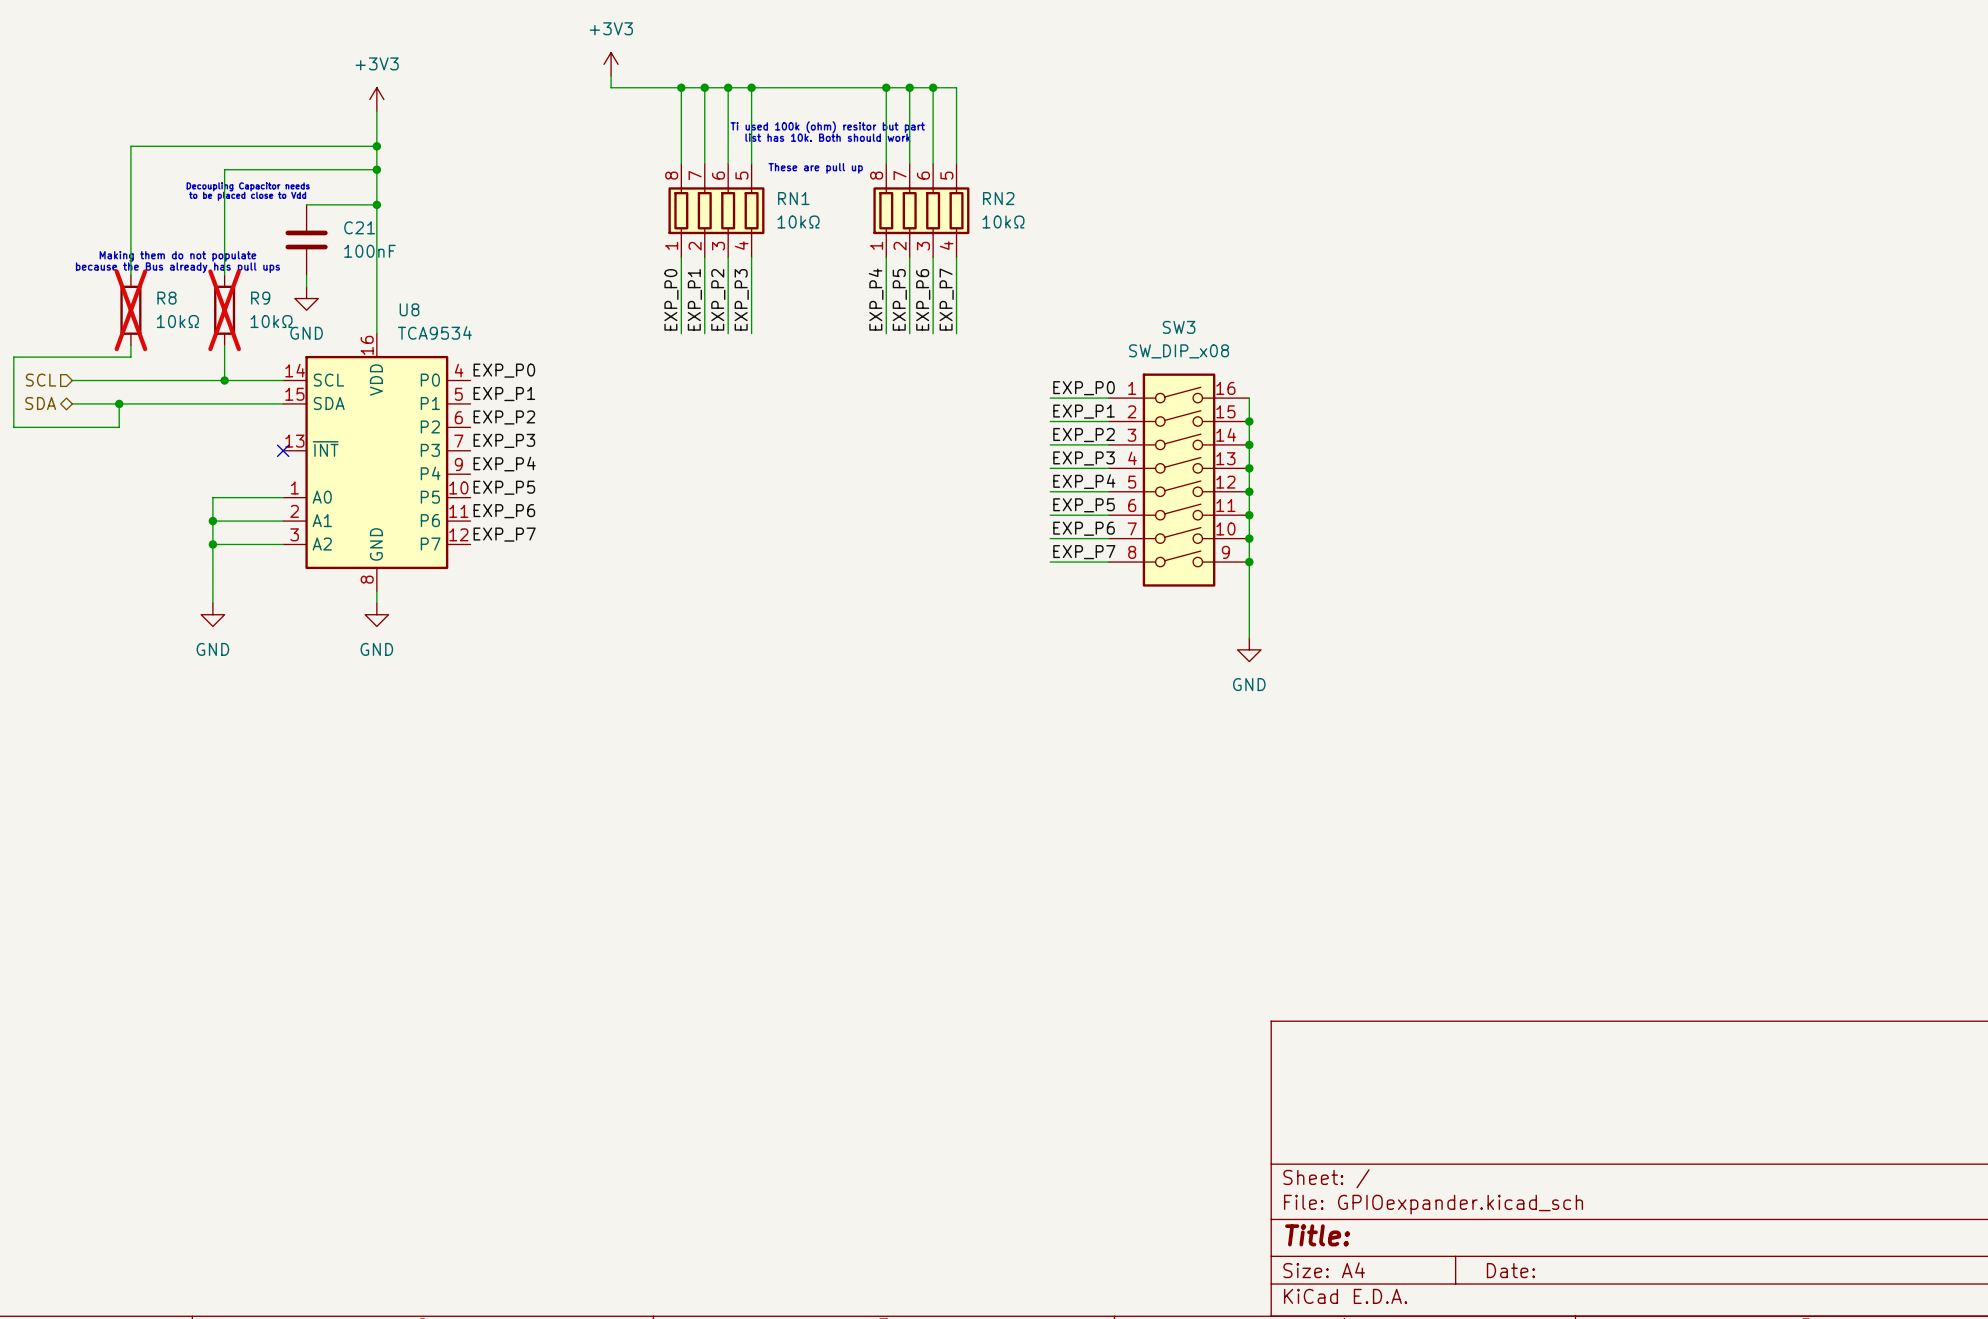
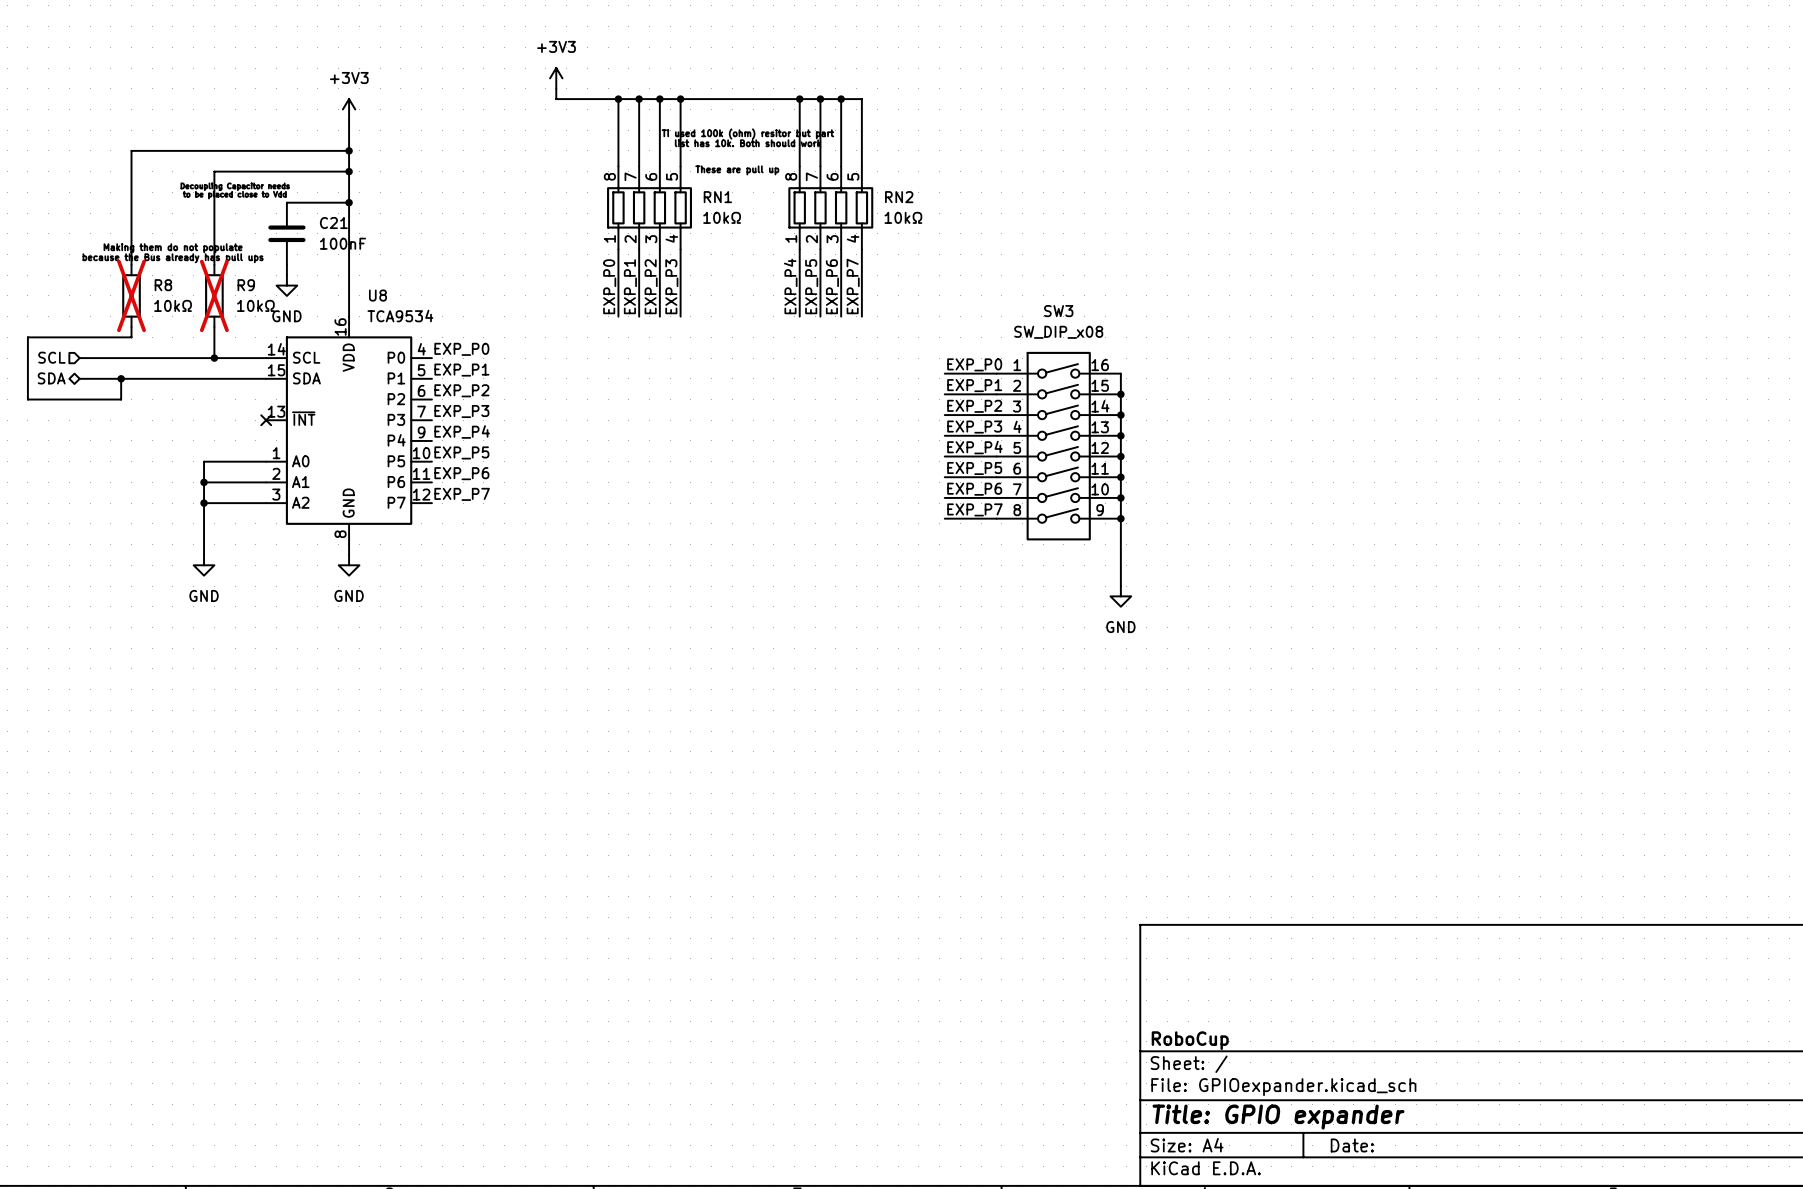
title block: none -> RoboCup (1190, 1040)
title block: Title: (1317, 1235) -> Title: GPIO expander (1278, 1117)

